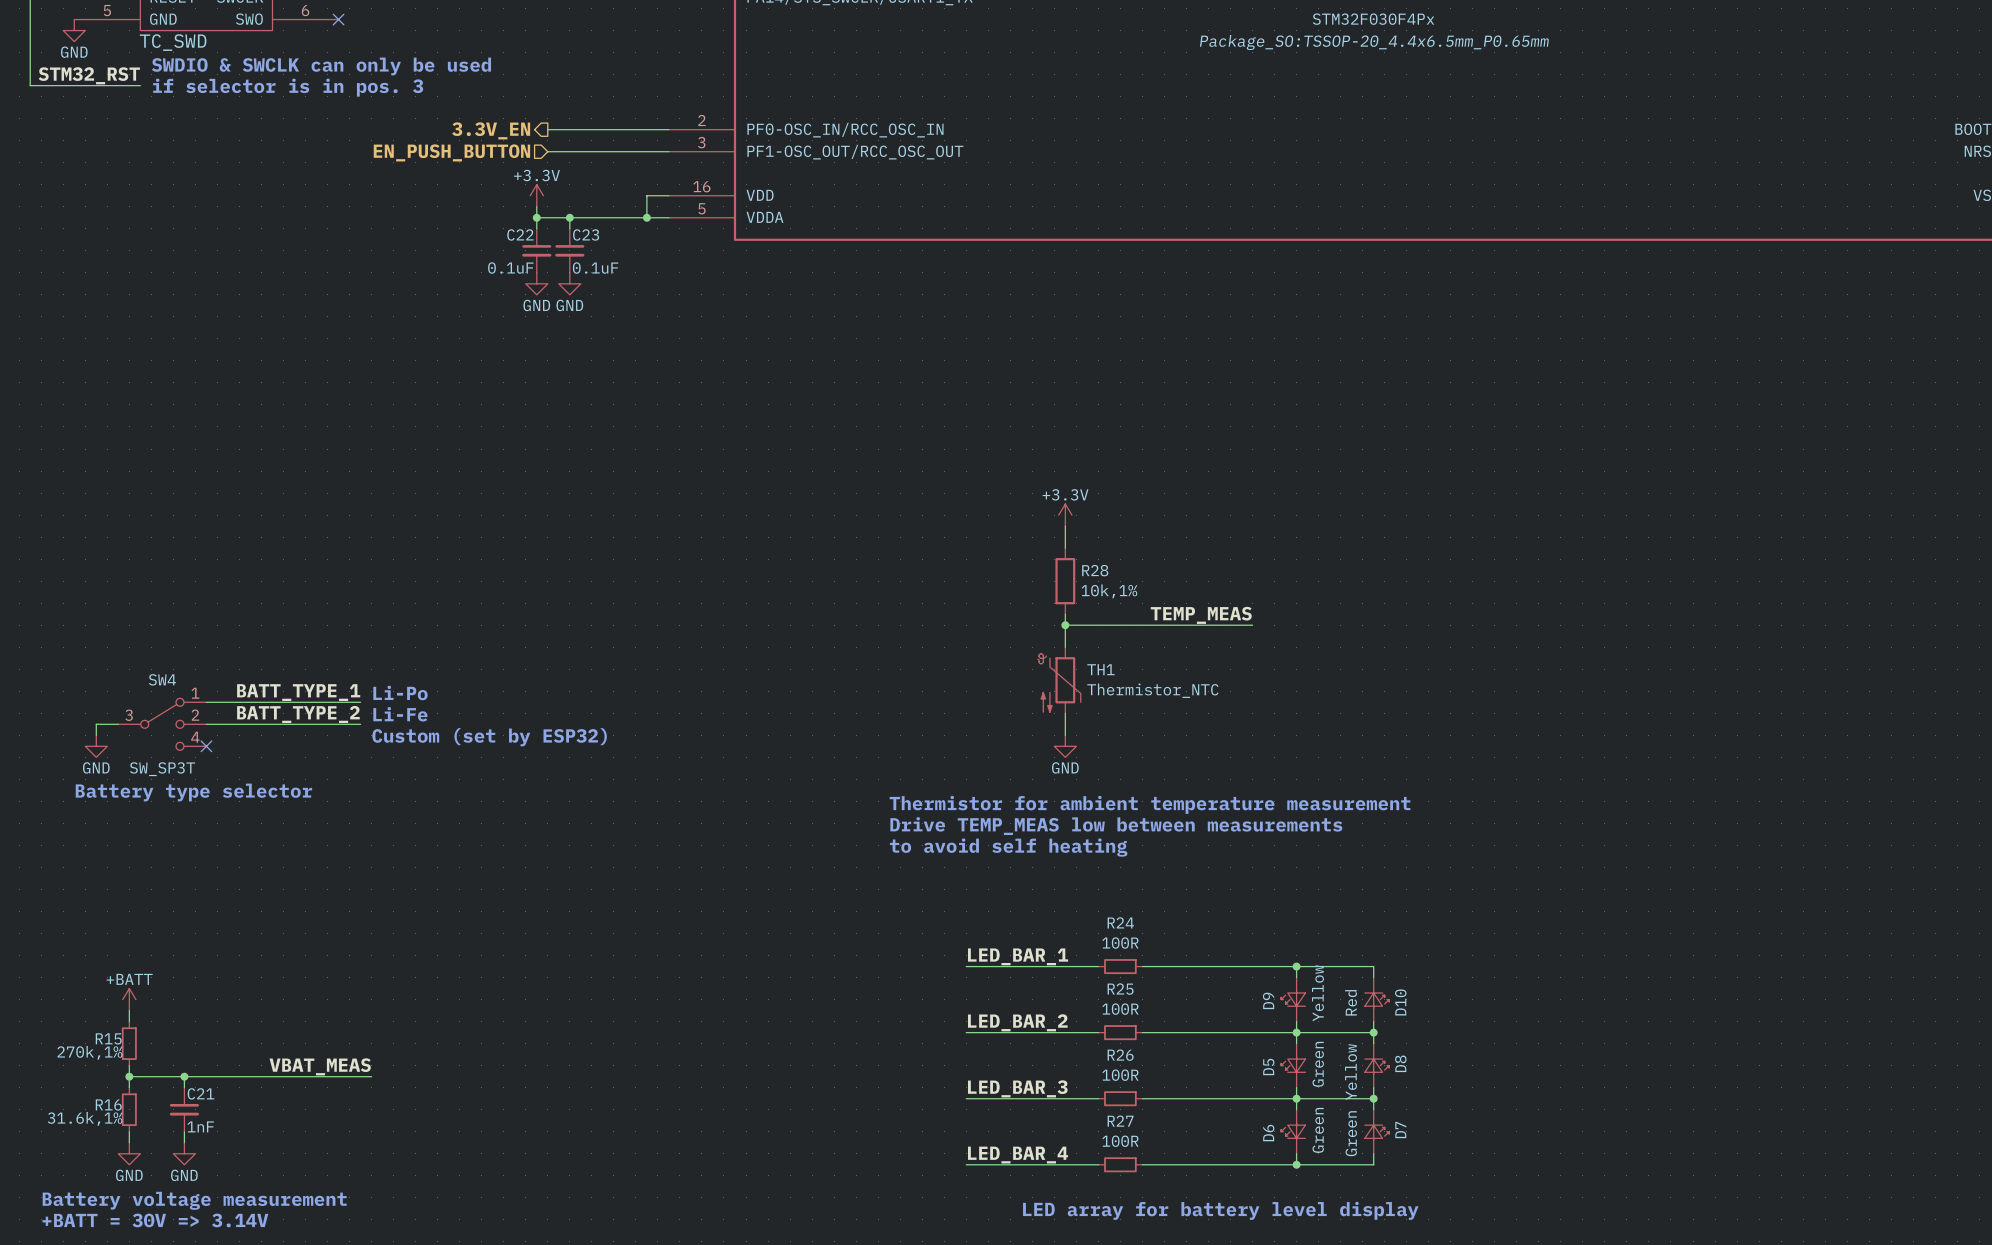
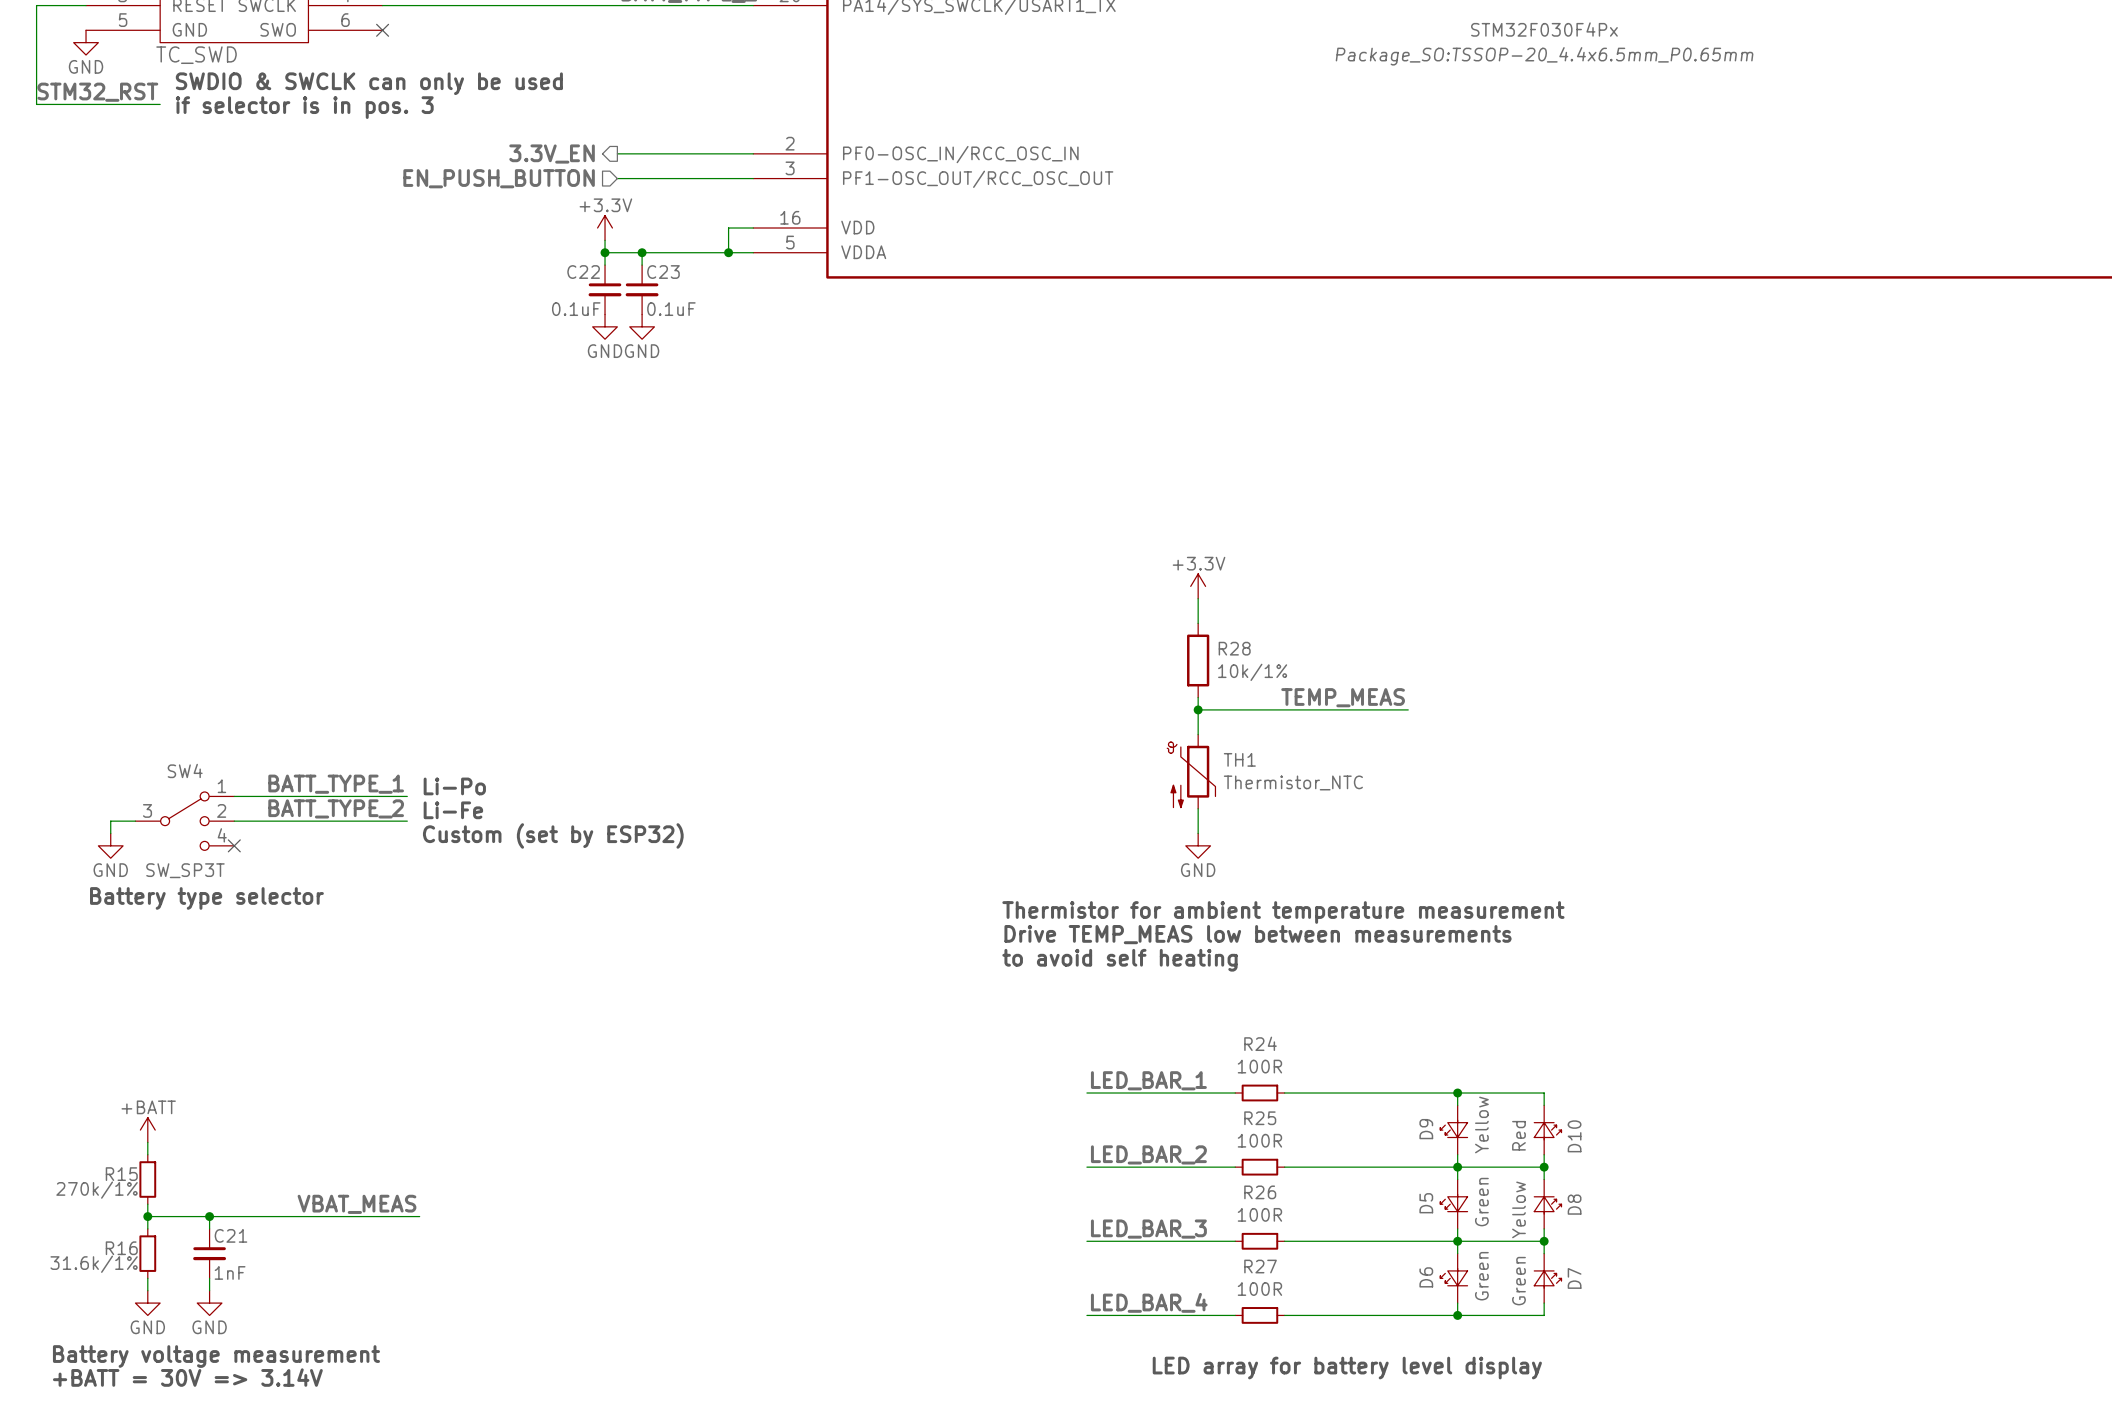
R28 value: 10k,1% (1109, 591) -> 10k/1% (1252, 672)
R15 value: 270k,1% (89, 1052) -> 270k/1% (97, 1190)
R16 value: 31.6k,1% (85, 1118) -> 31.6k/1% (94, 1264)

